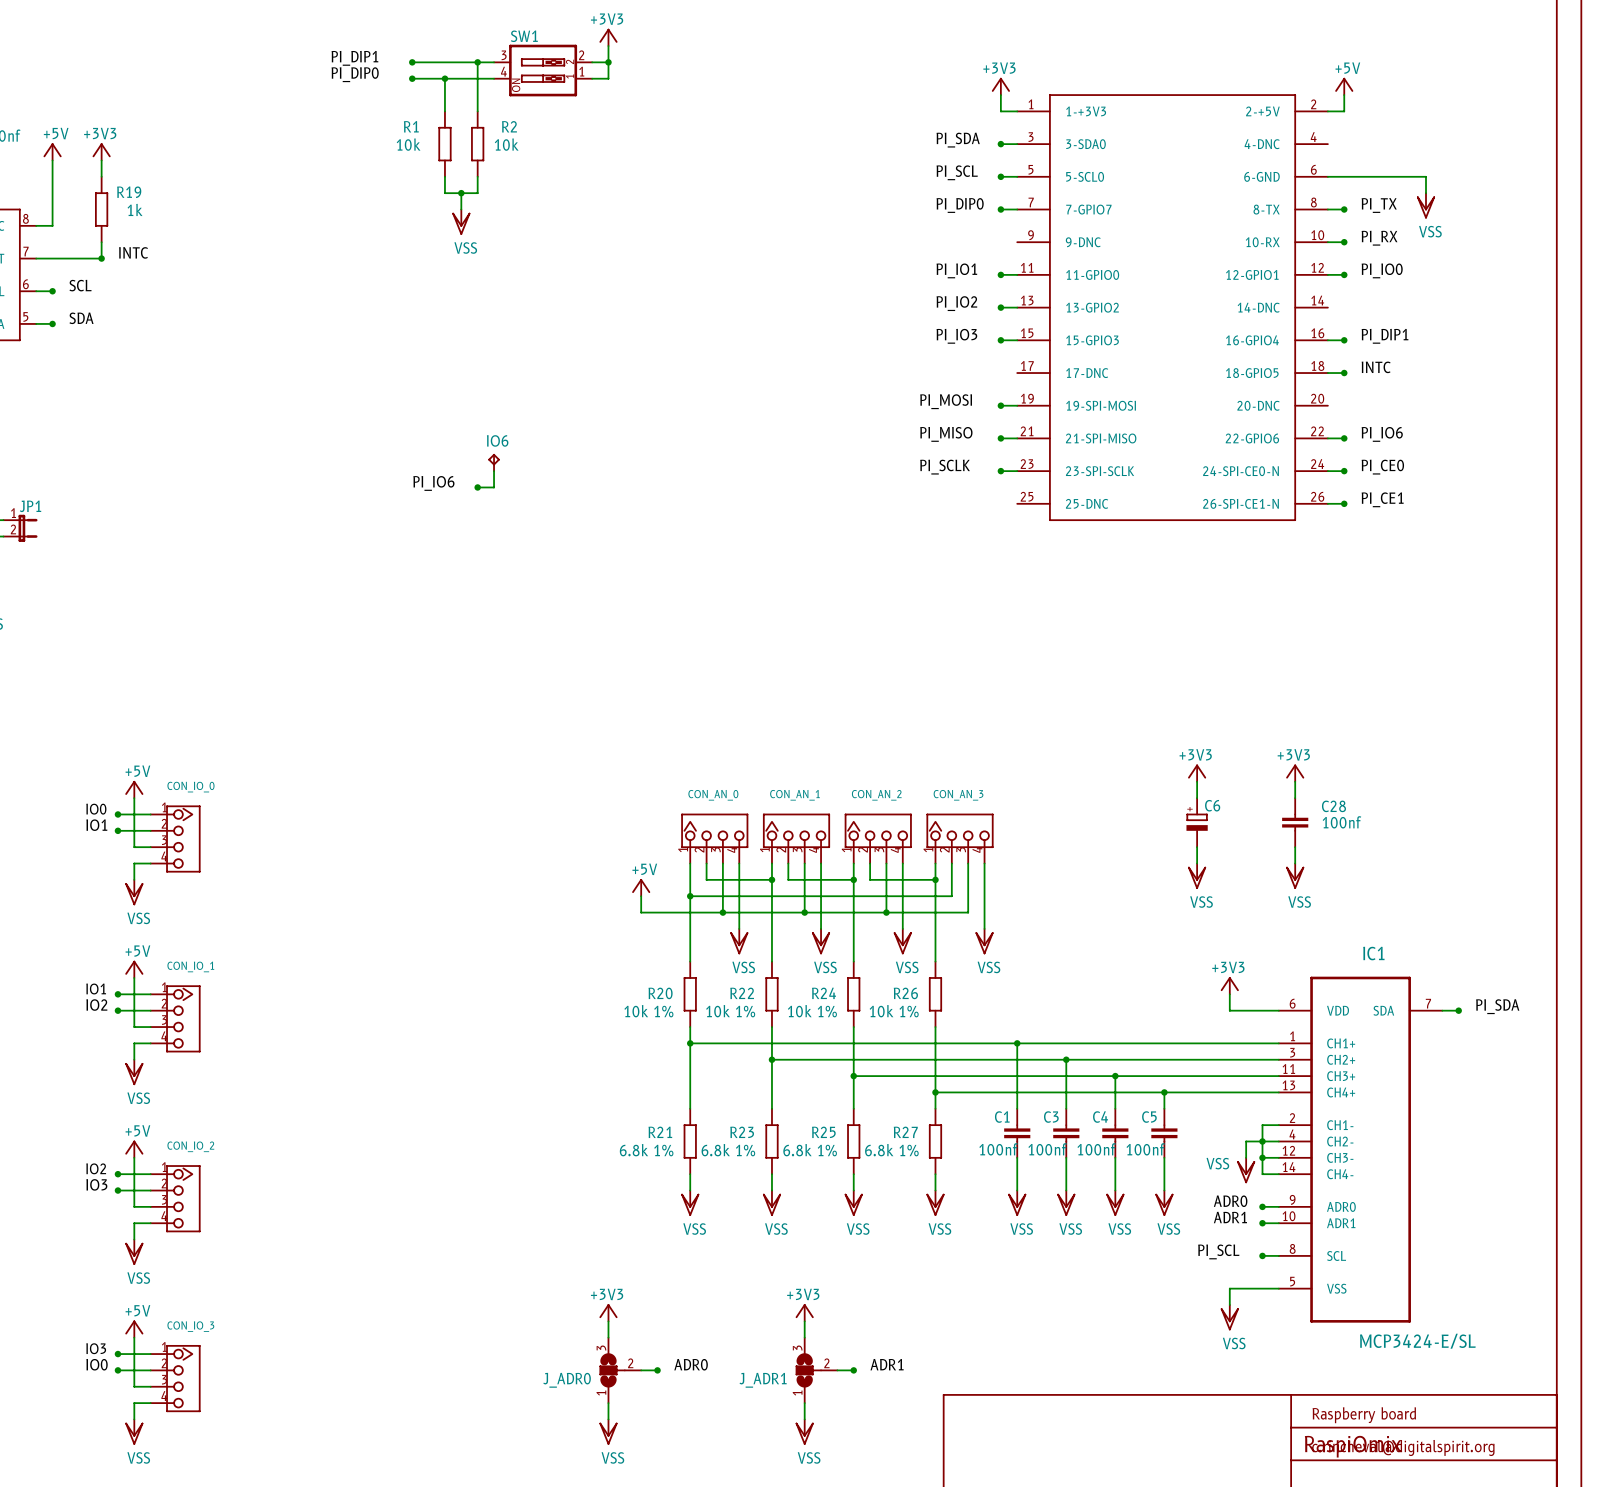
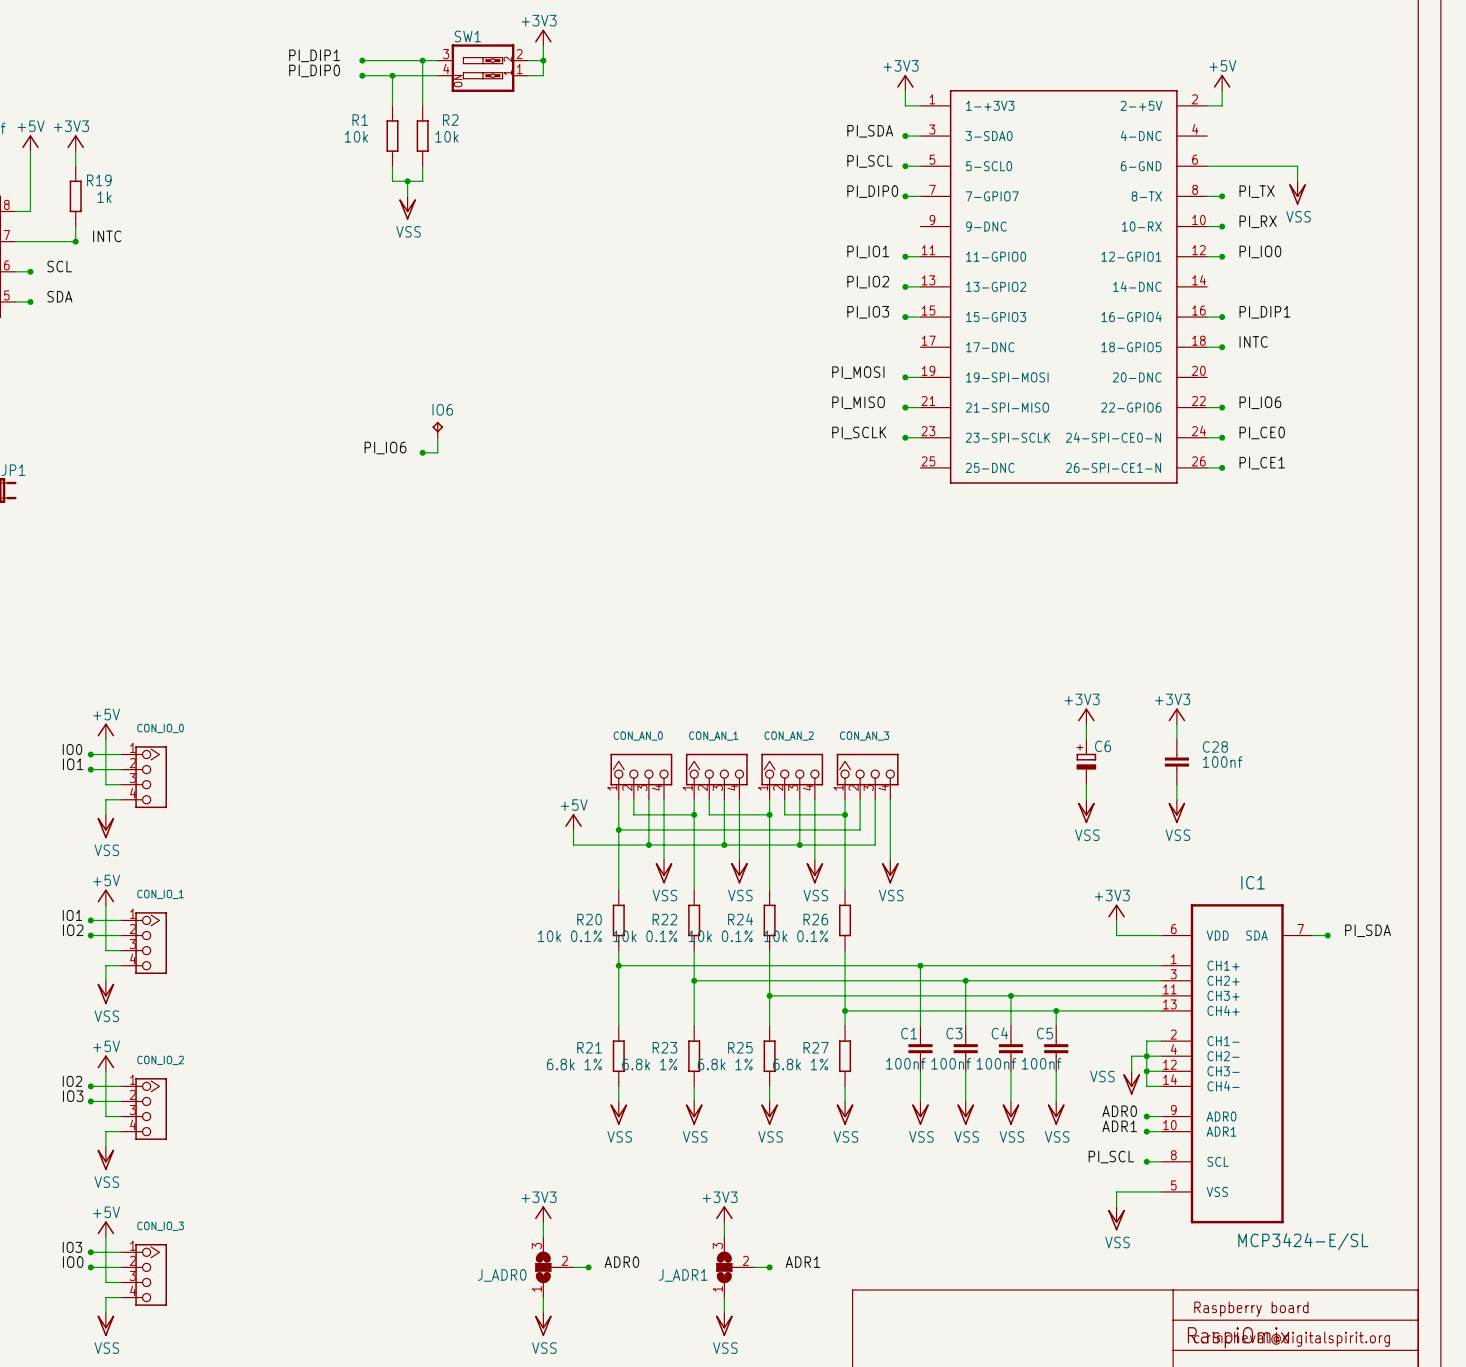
R20 value: 10k 1% (648, 1011) -> 10k 0.1% (569, 936)
R22 value: 10k 1% (730, 1011) -> 10k 0.1% (645, 936)
R24 value: 10k 1% (812, 1011) -> 10k 0.1% (720, 936)
R26 value: 10k 1% (894, 1011) -> 10k 0.1% (796, 936)

